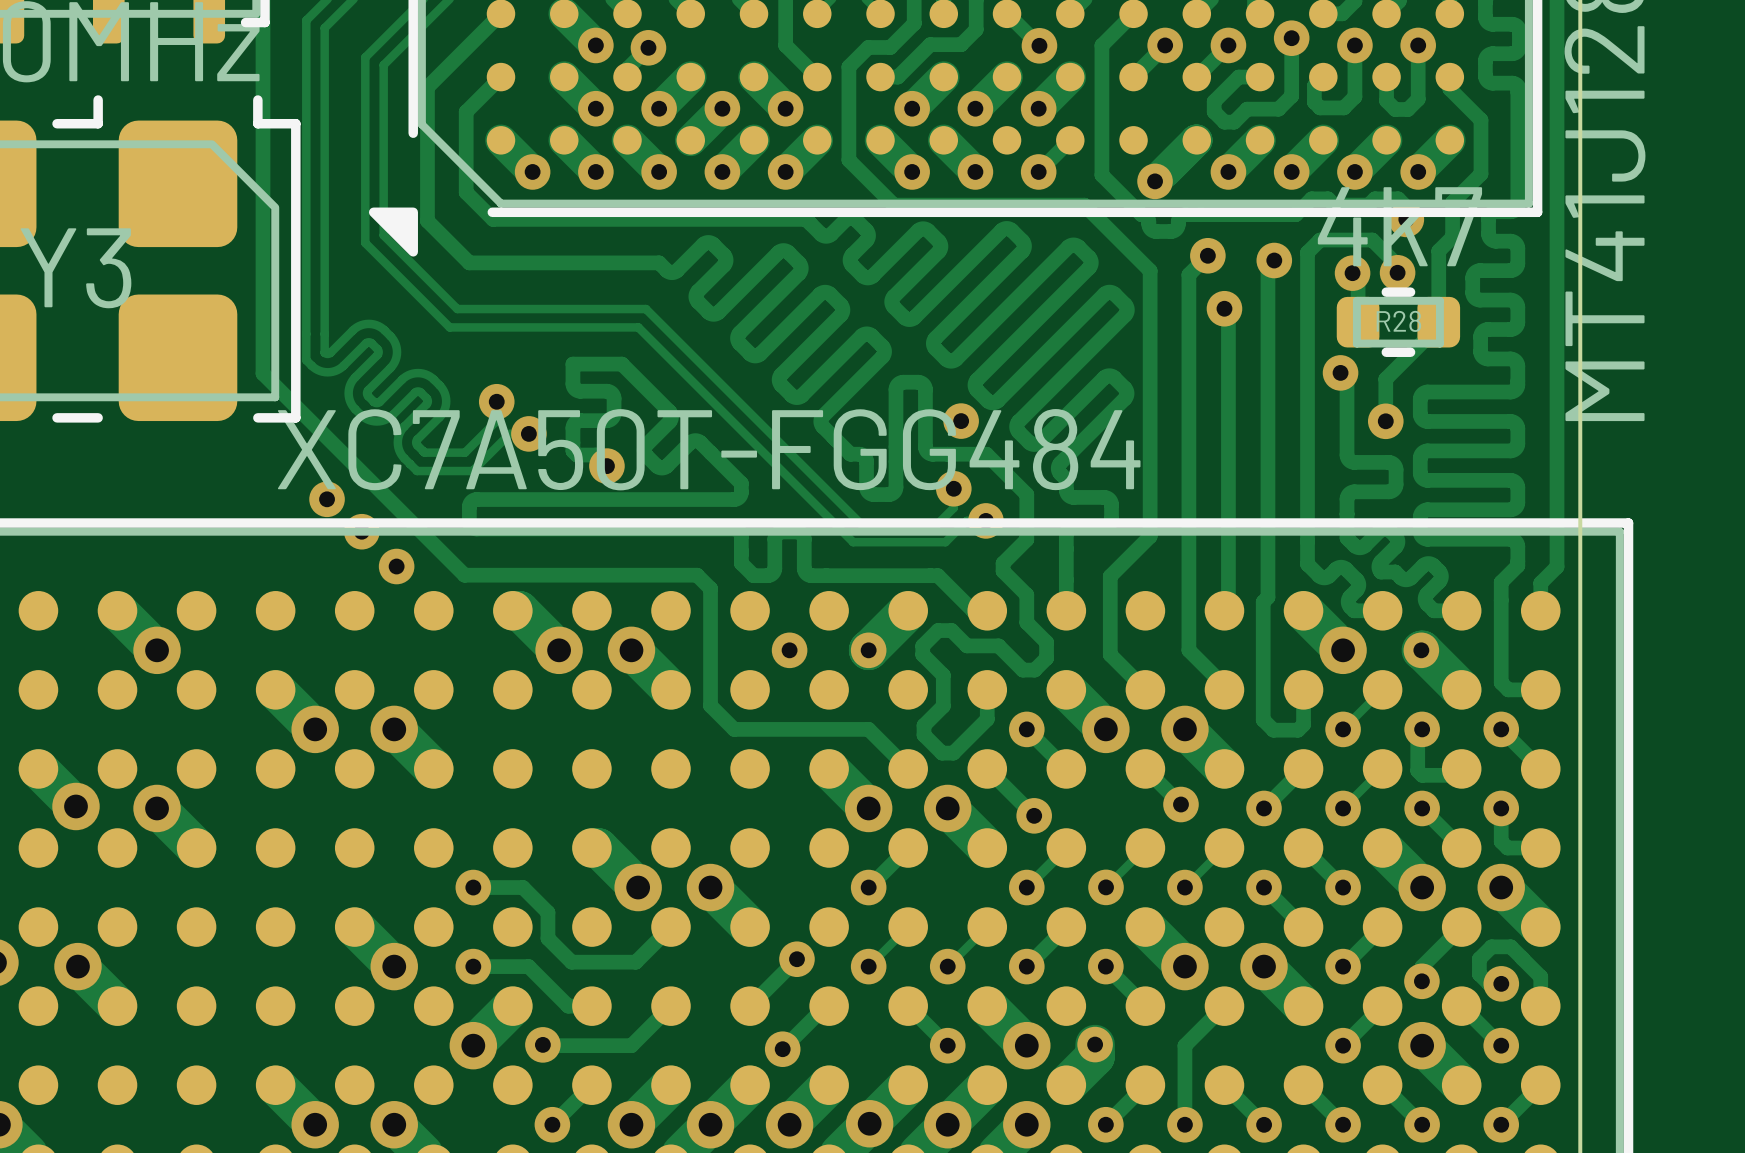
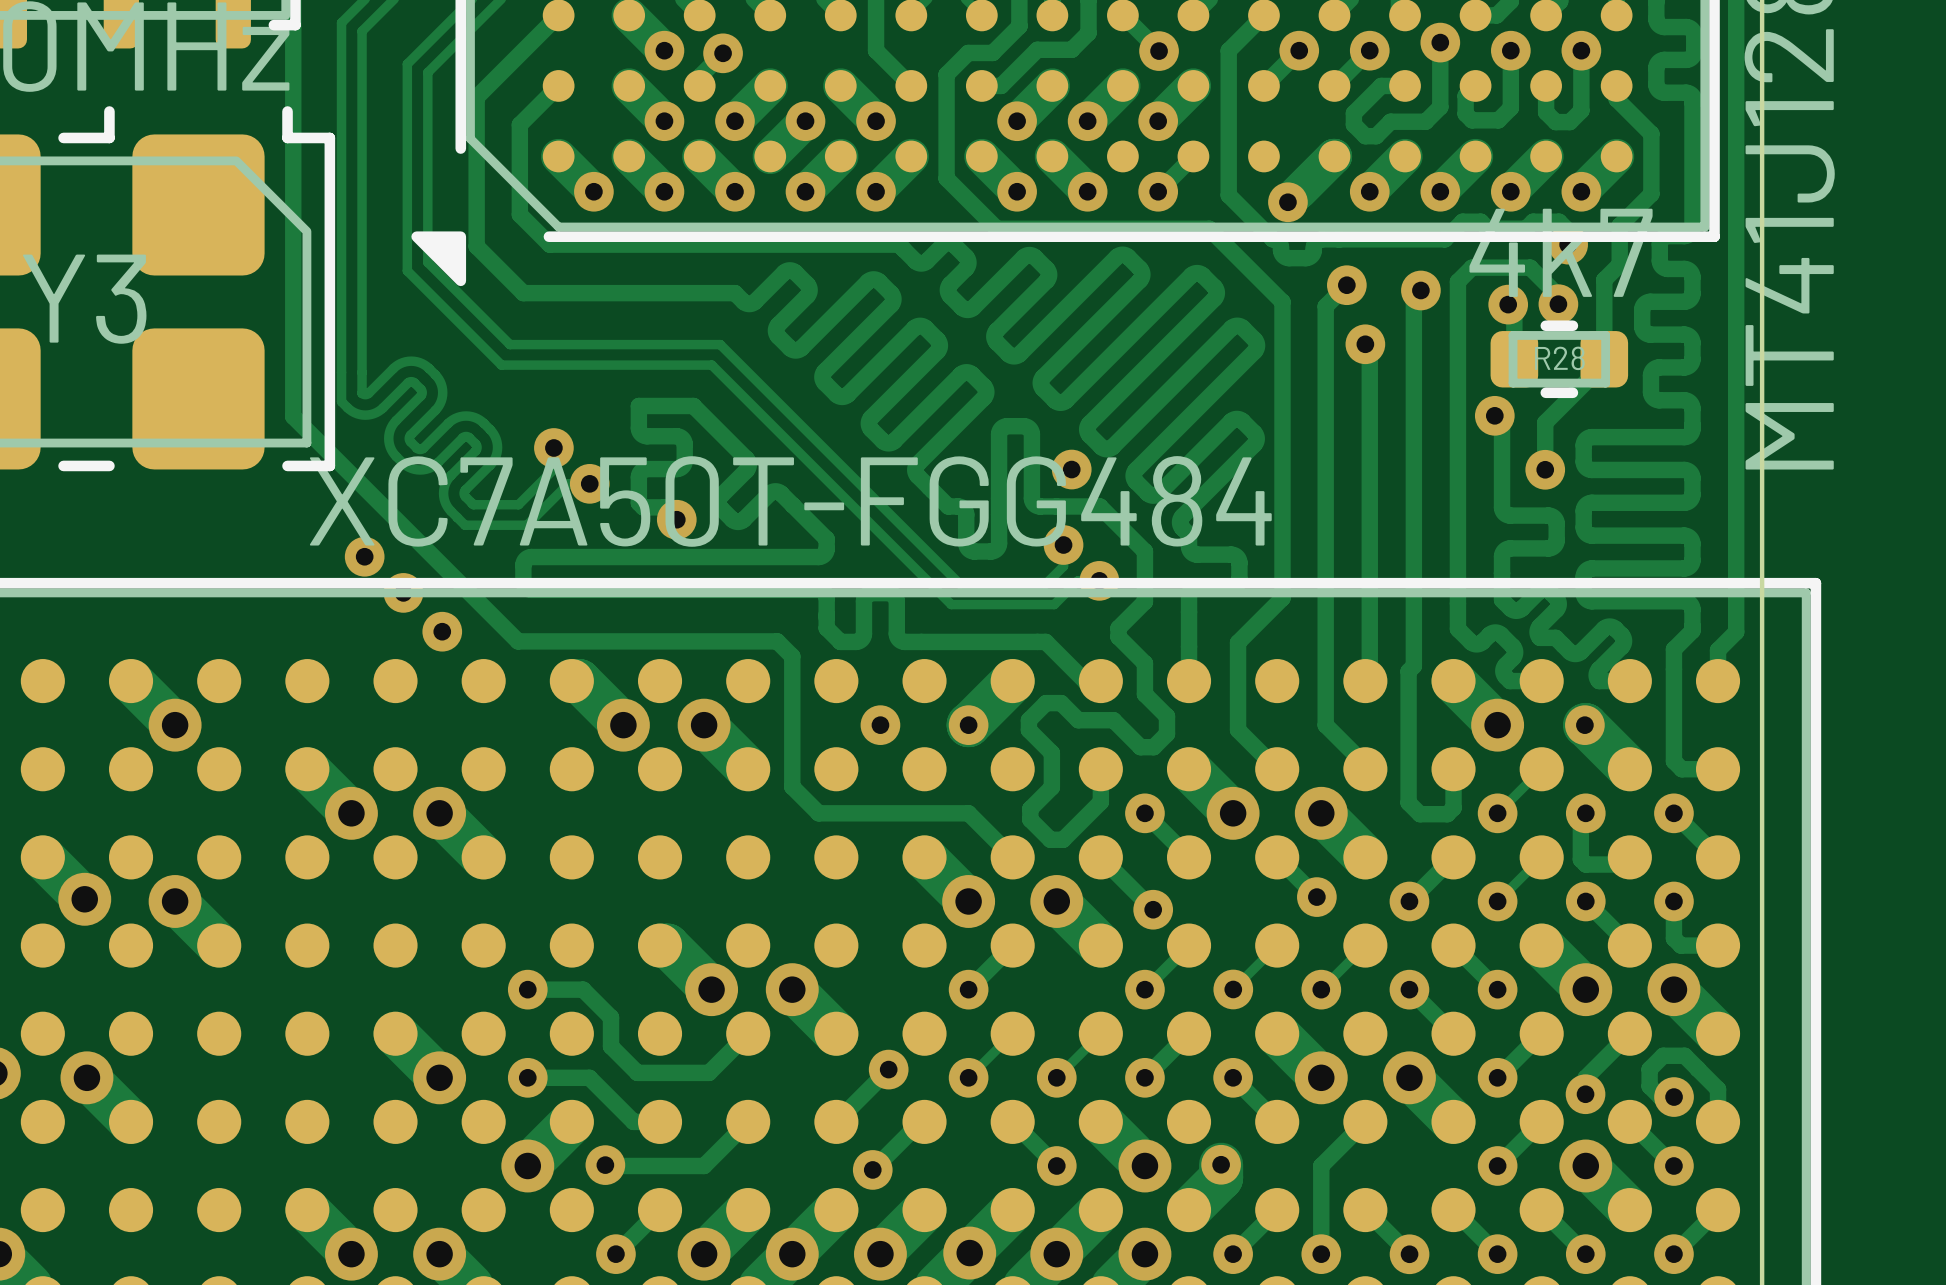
track: (1400, 577) (1409, 579) (1427, 563) (1432, 564) (1439, 571) (1440, 579) (1425, 598) (1426, 602) (1434, 610) -> (1562, 644) (1570, 652) (1576, 653) (1606, 626) (1614, 627) (1621, 635) (1624, 640) (1622, 645) (1597, 671) (1596, 676) (1599, 681)

